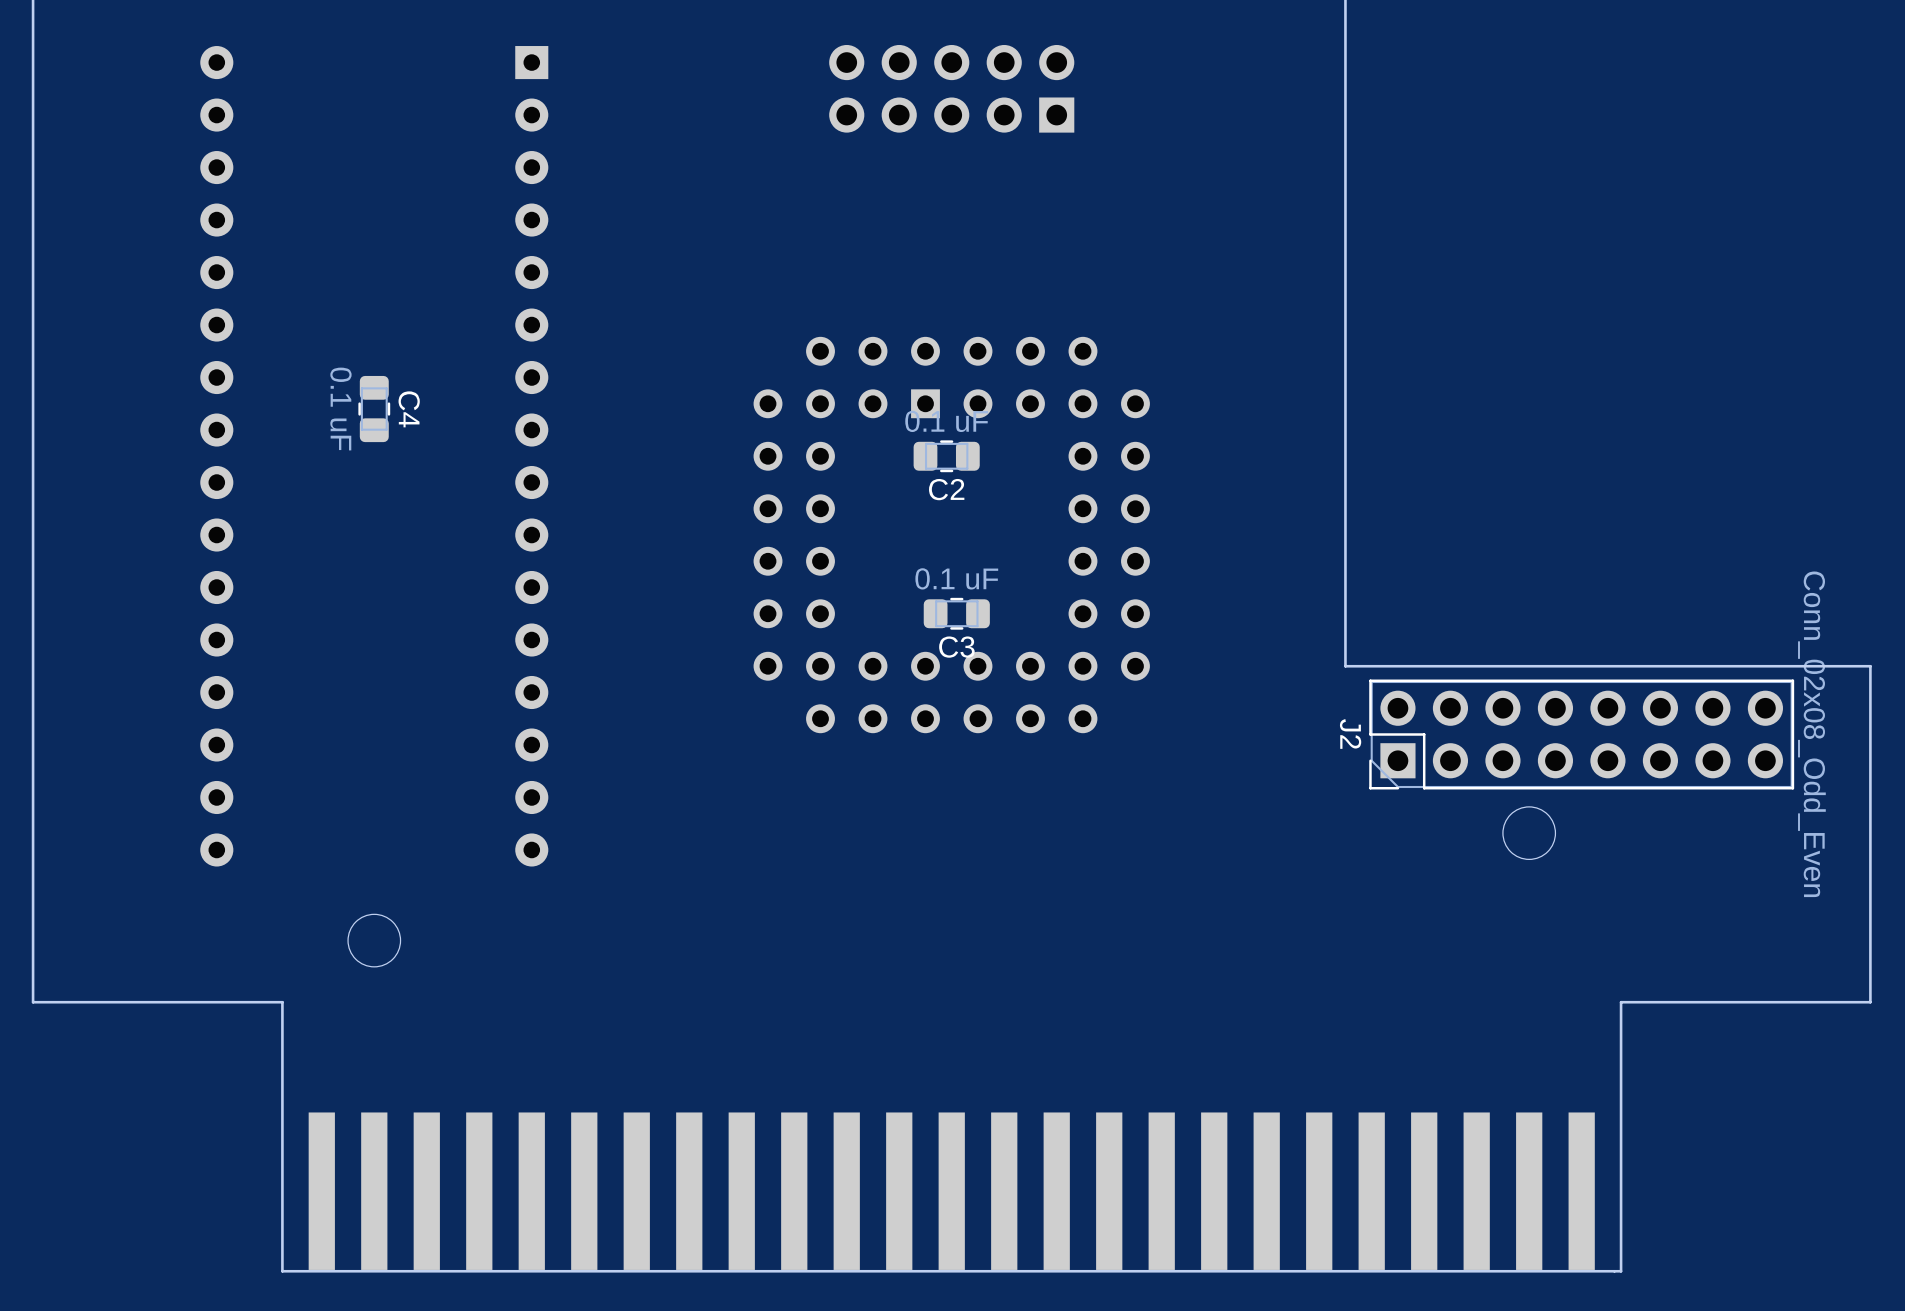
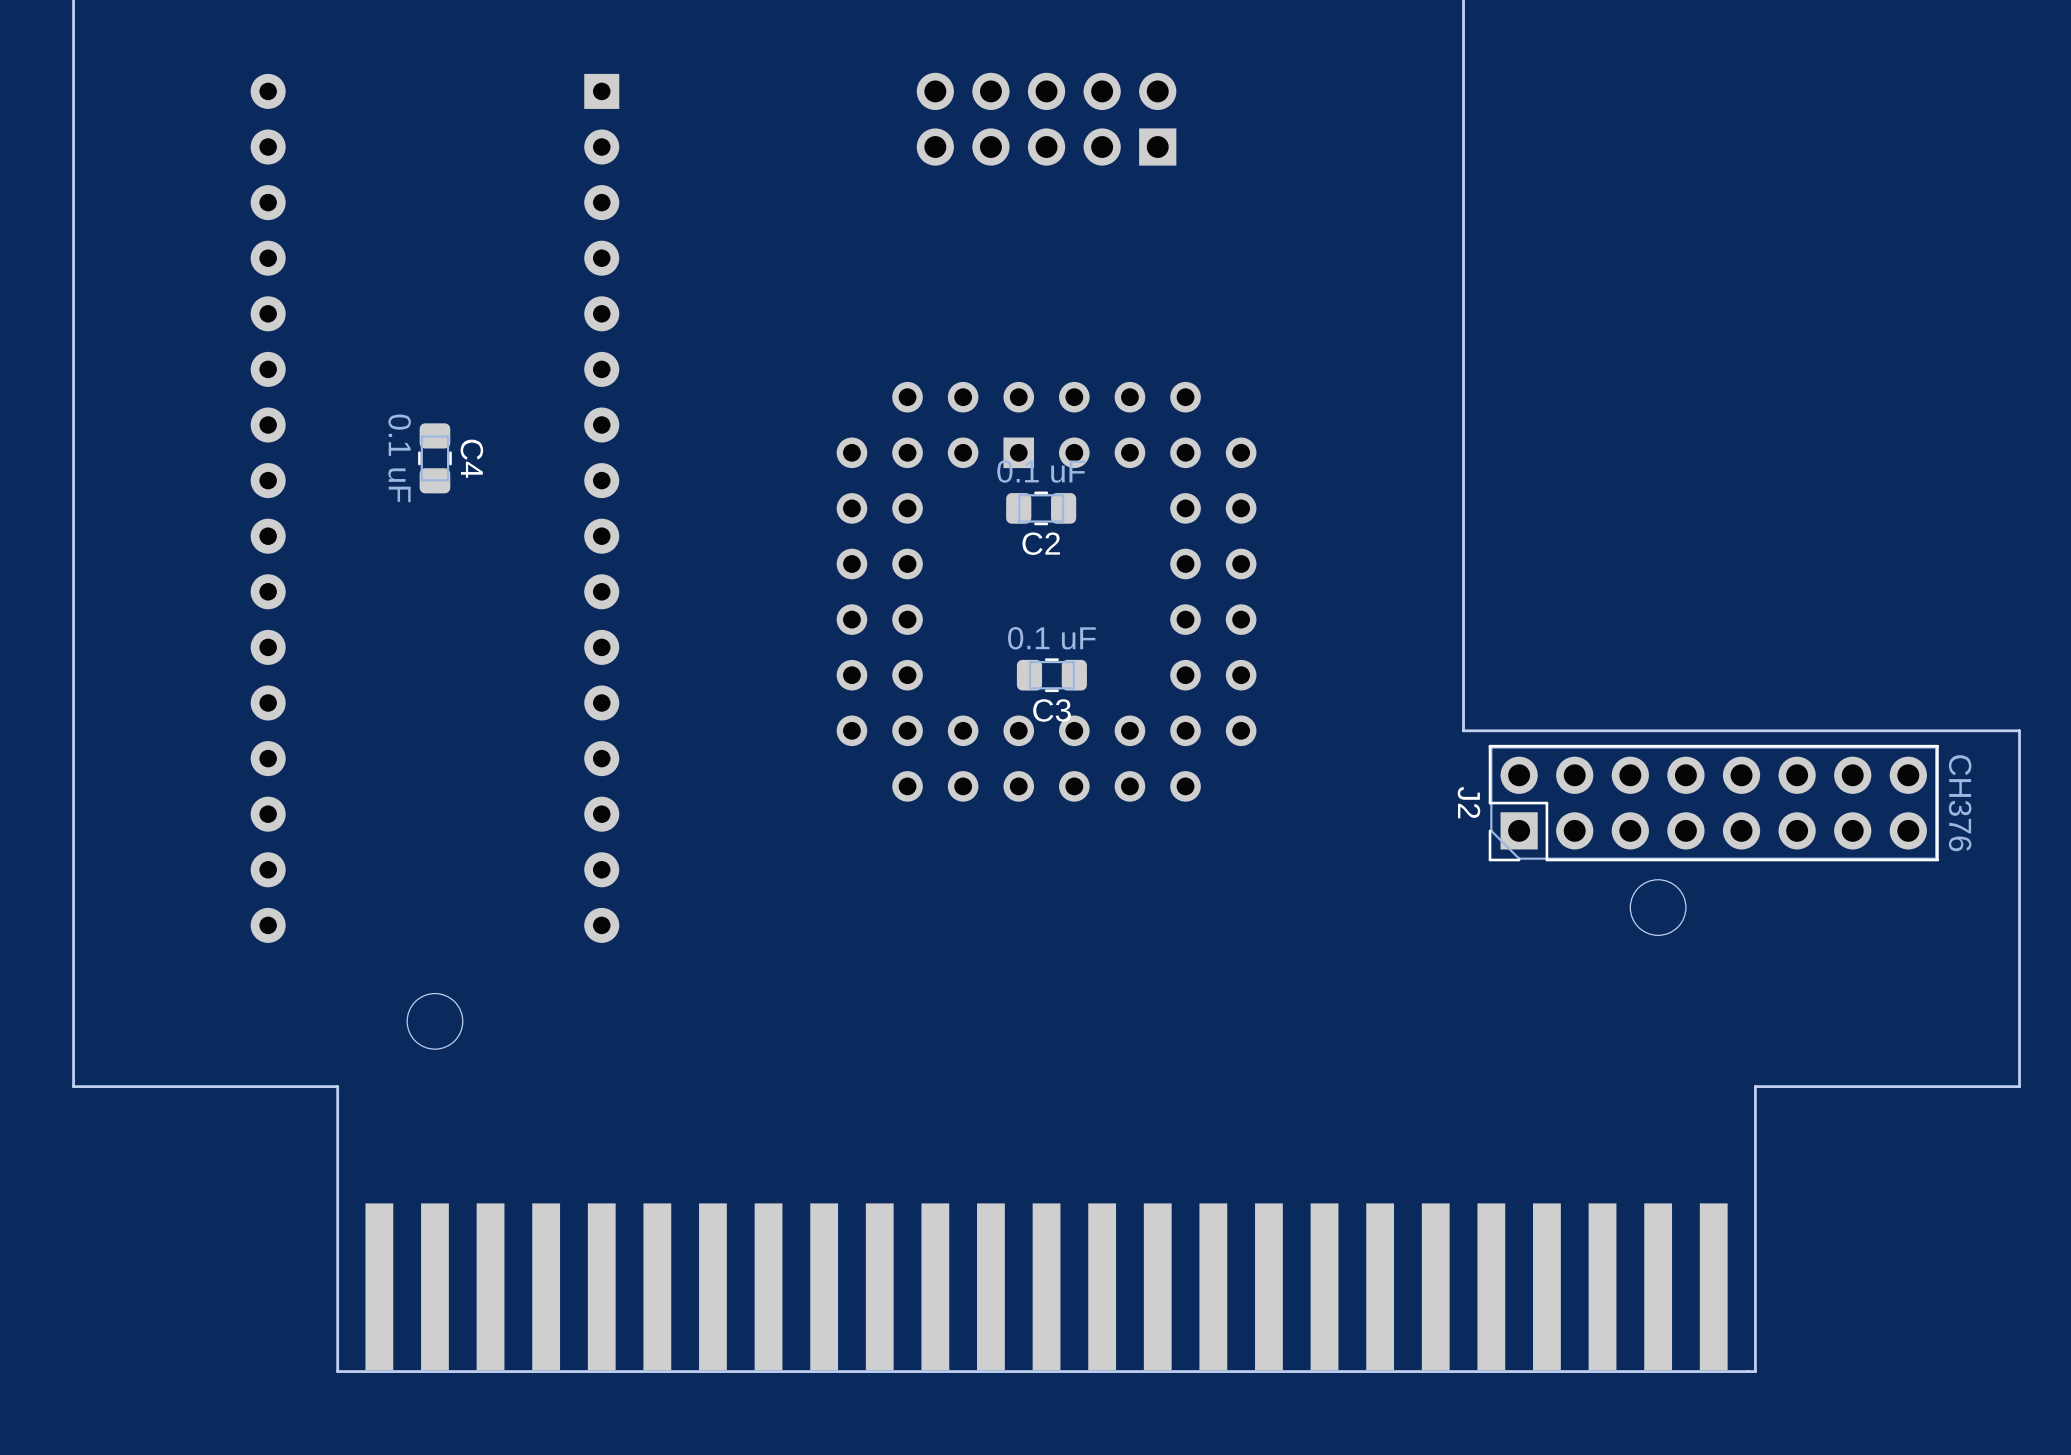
J2 value: Conn_02x08_Odd_Even (1811, 734) -> CH376 (1960, 803)

